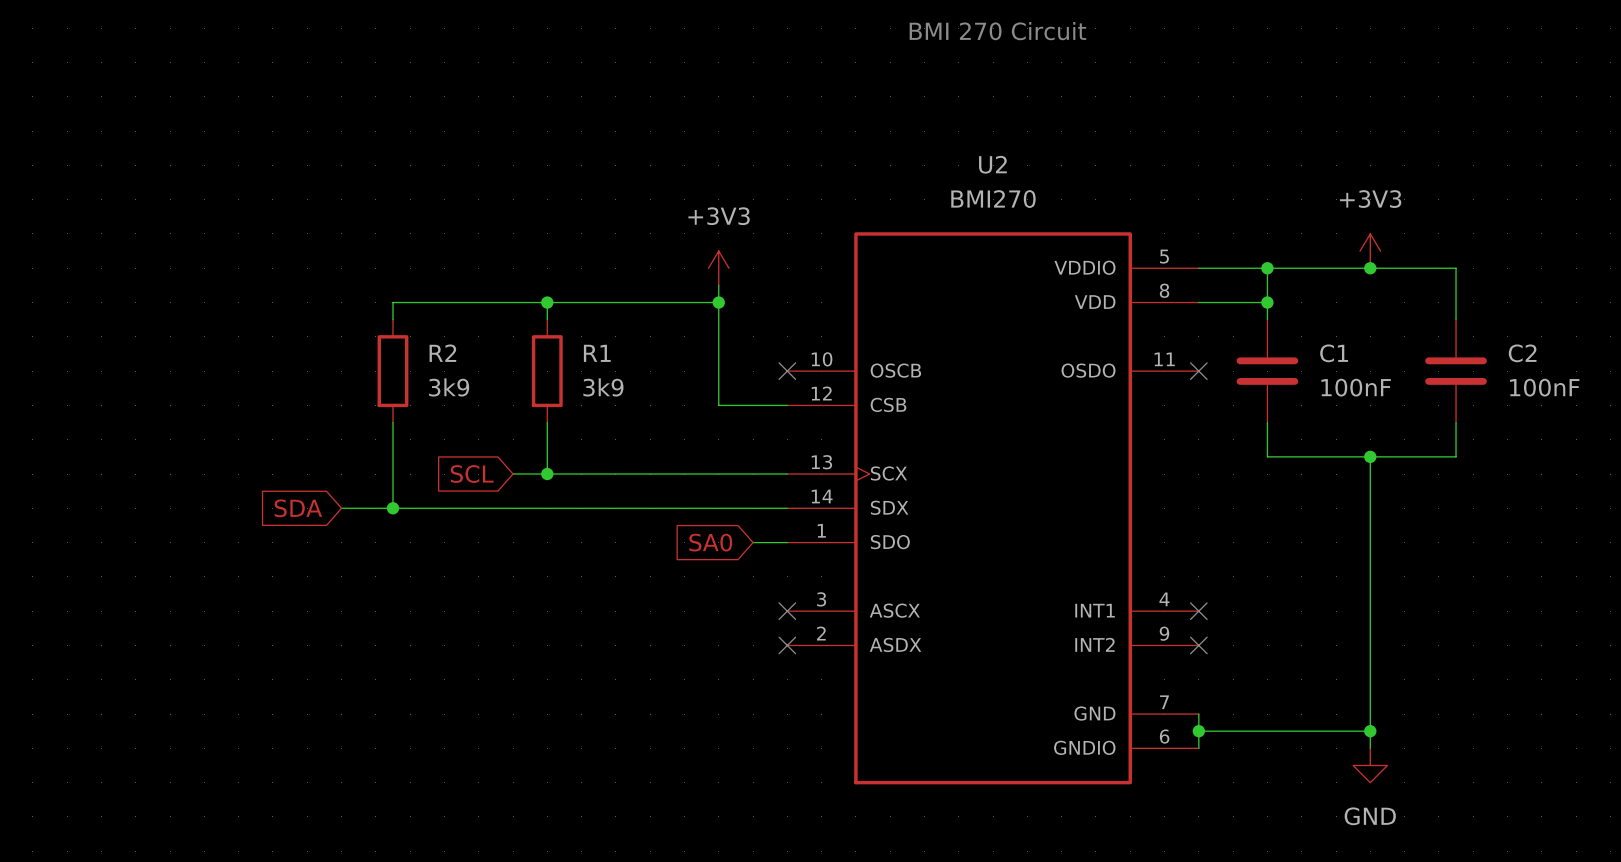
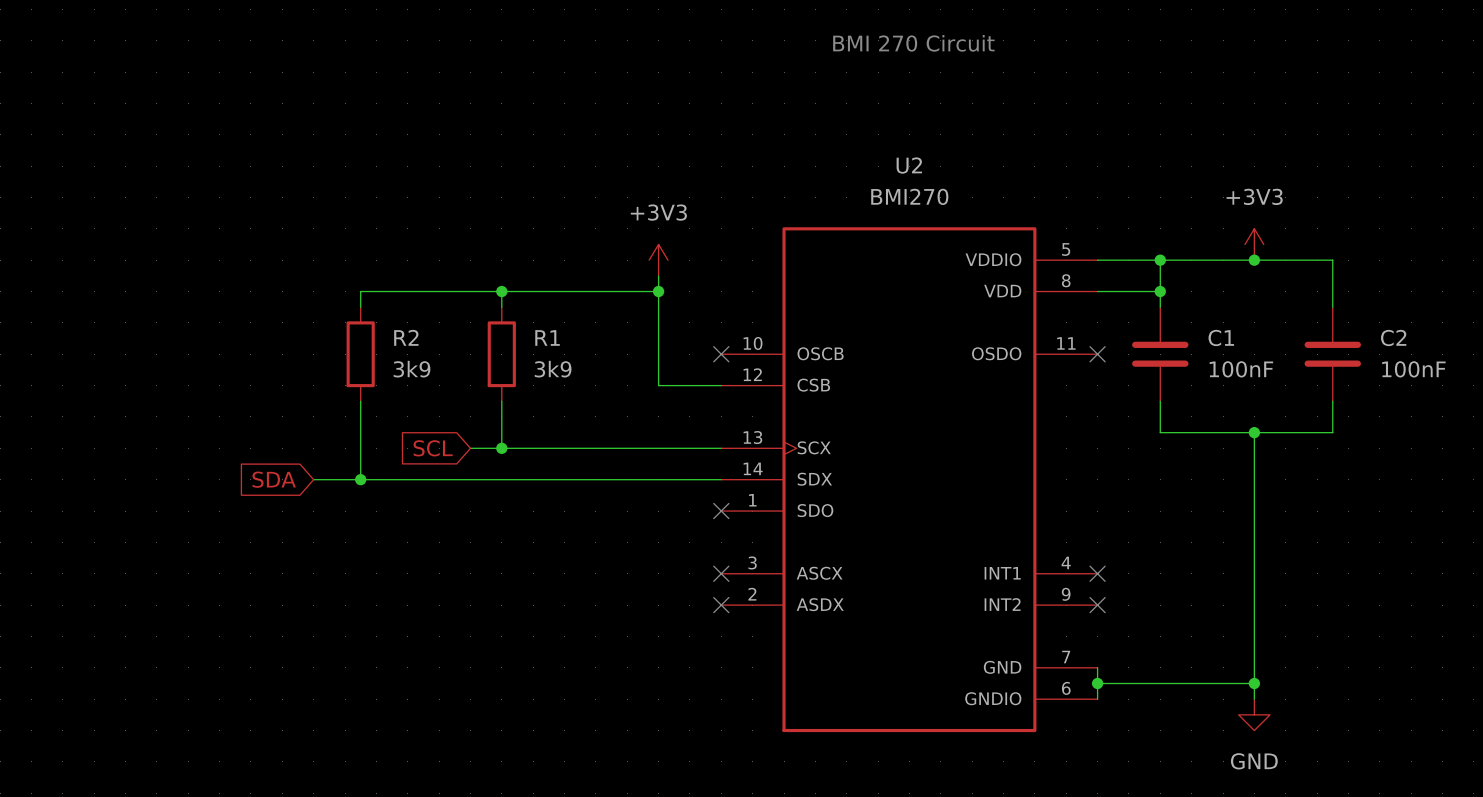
global label: SA0 (710, 542) -> none
wire: (753, 542) (787, 542) -> none
no-connect mark: none -> (721, 511)

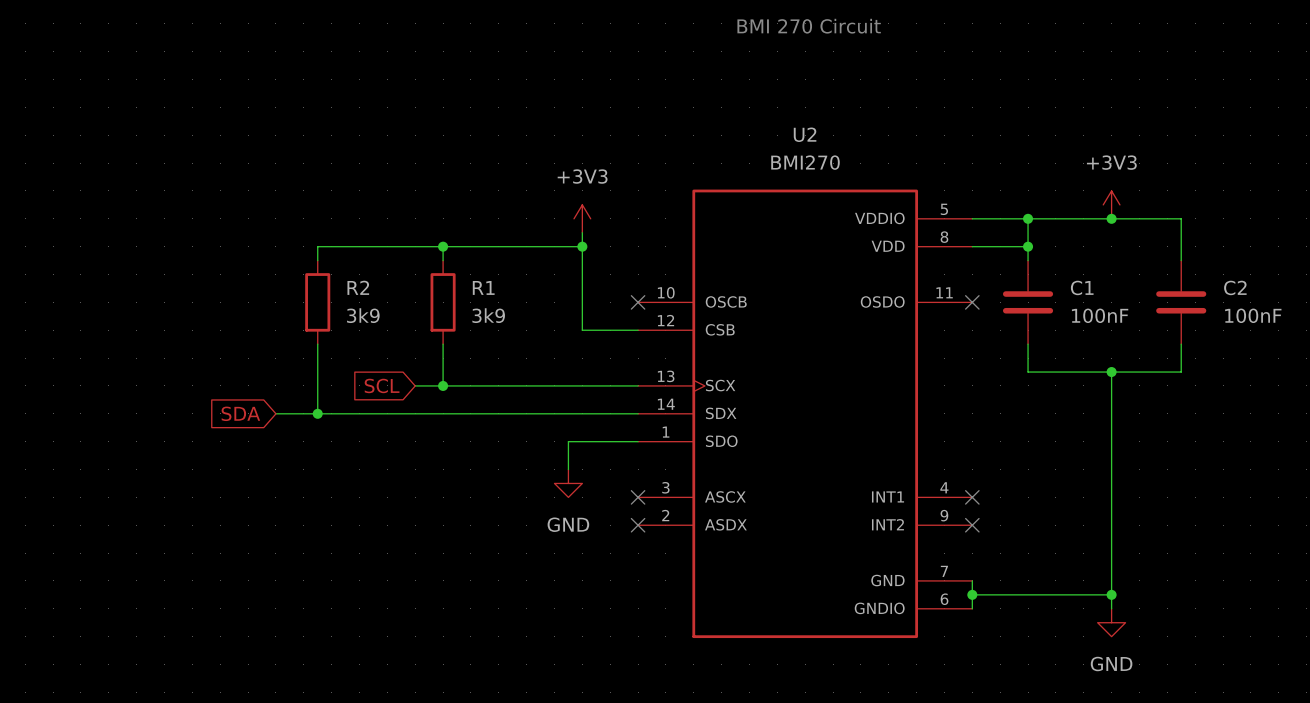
wire: none -> (638, 441) (568, 441) (568, 469)
no-connect mark: (721, 511) -> none
power symbol: none -> GND (568, 483)

